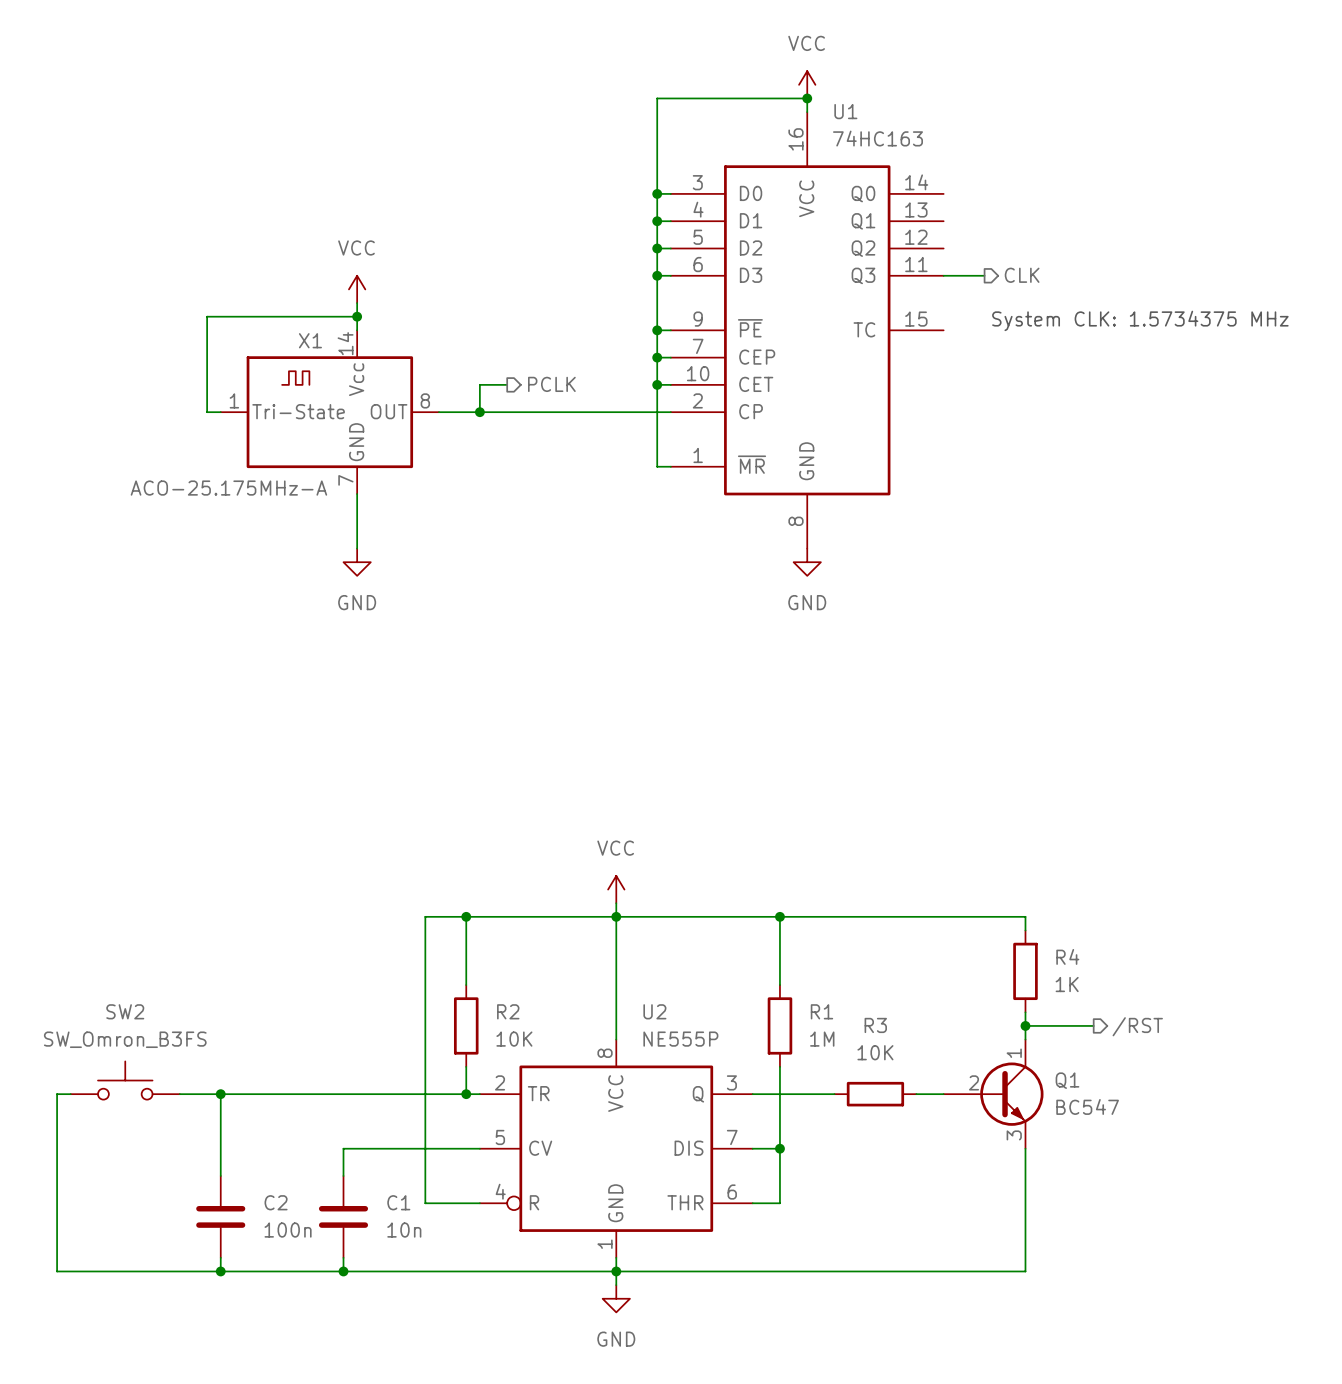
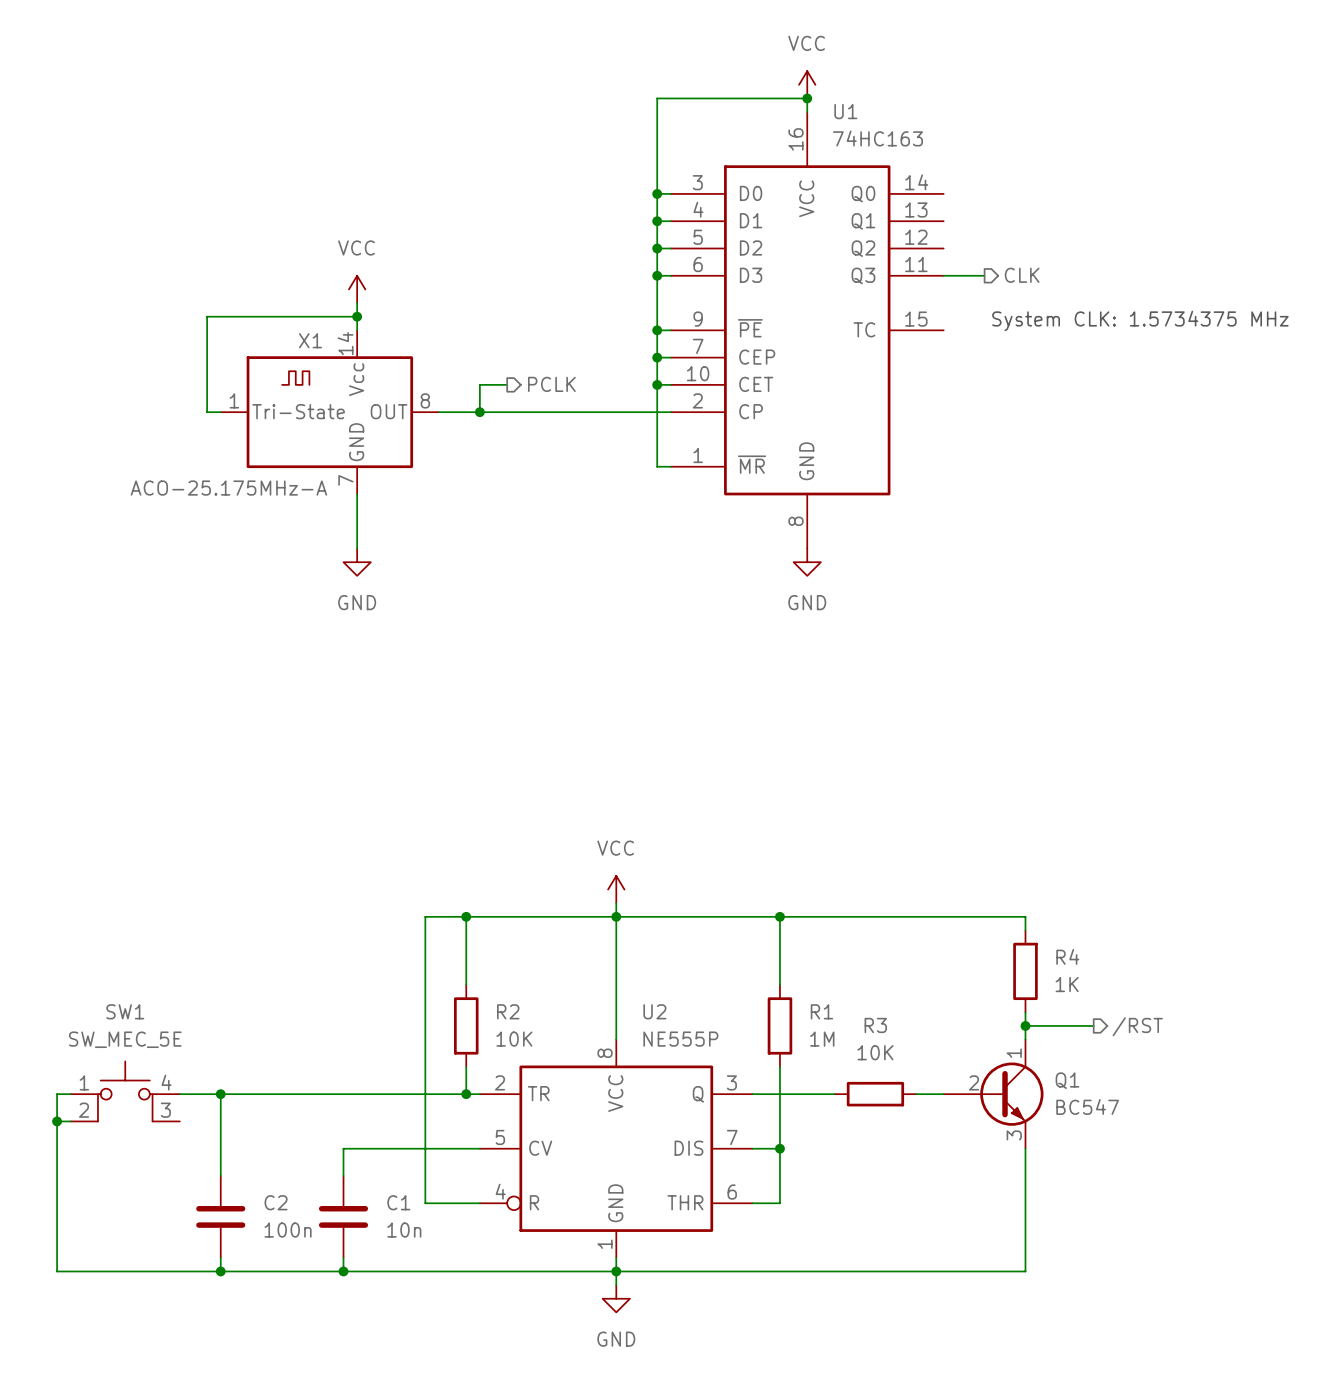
SW2: SW_Omron_B3FS (125, 1080) -> none
SW1: none -> SW_MEC_5E (125, 1091)
wire: none -> (57, 1121) (70, 1121)
junction: none -> (57, 1121)

